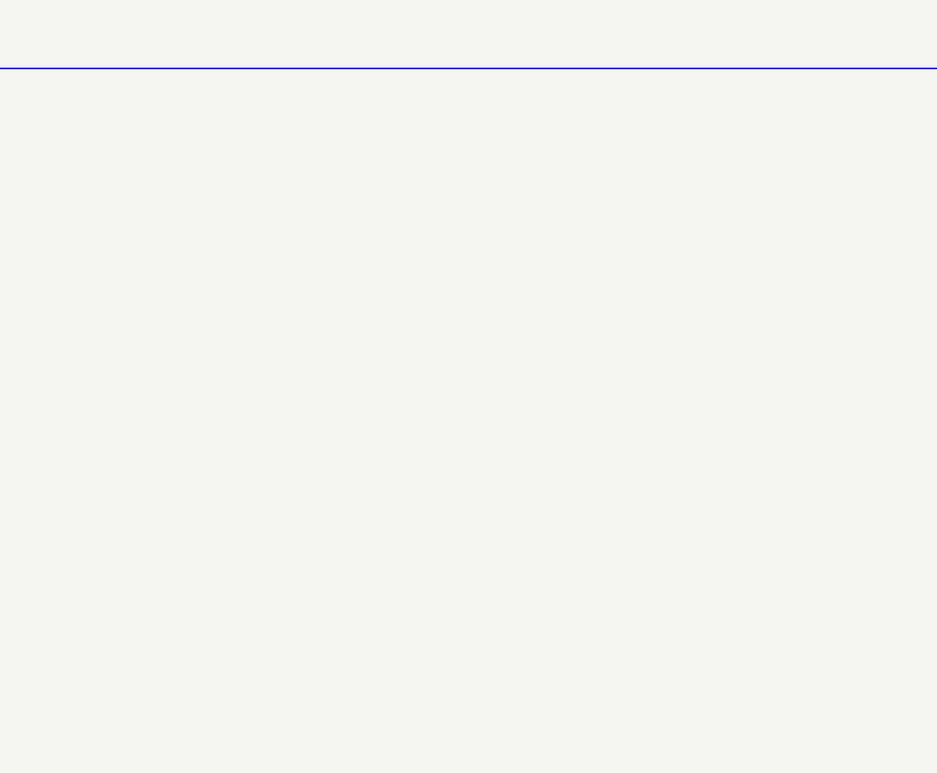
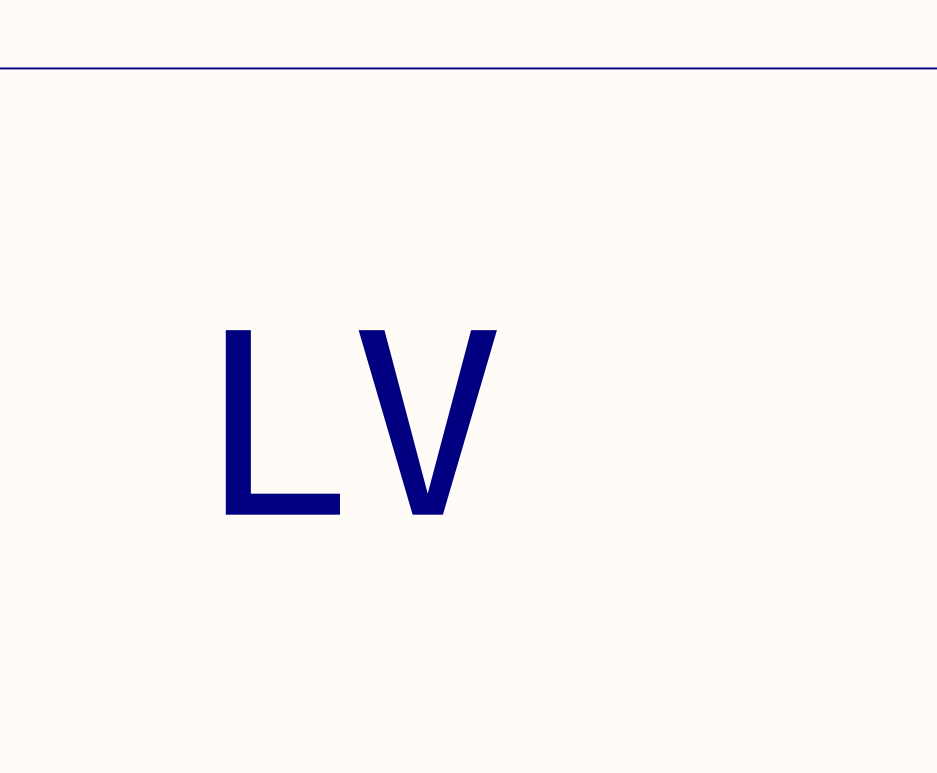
text: none -> LV (361, 422)

